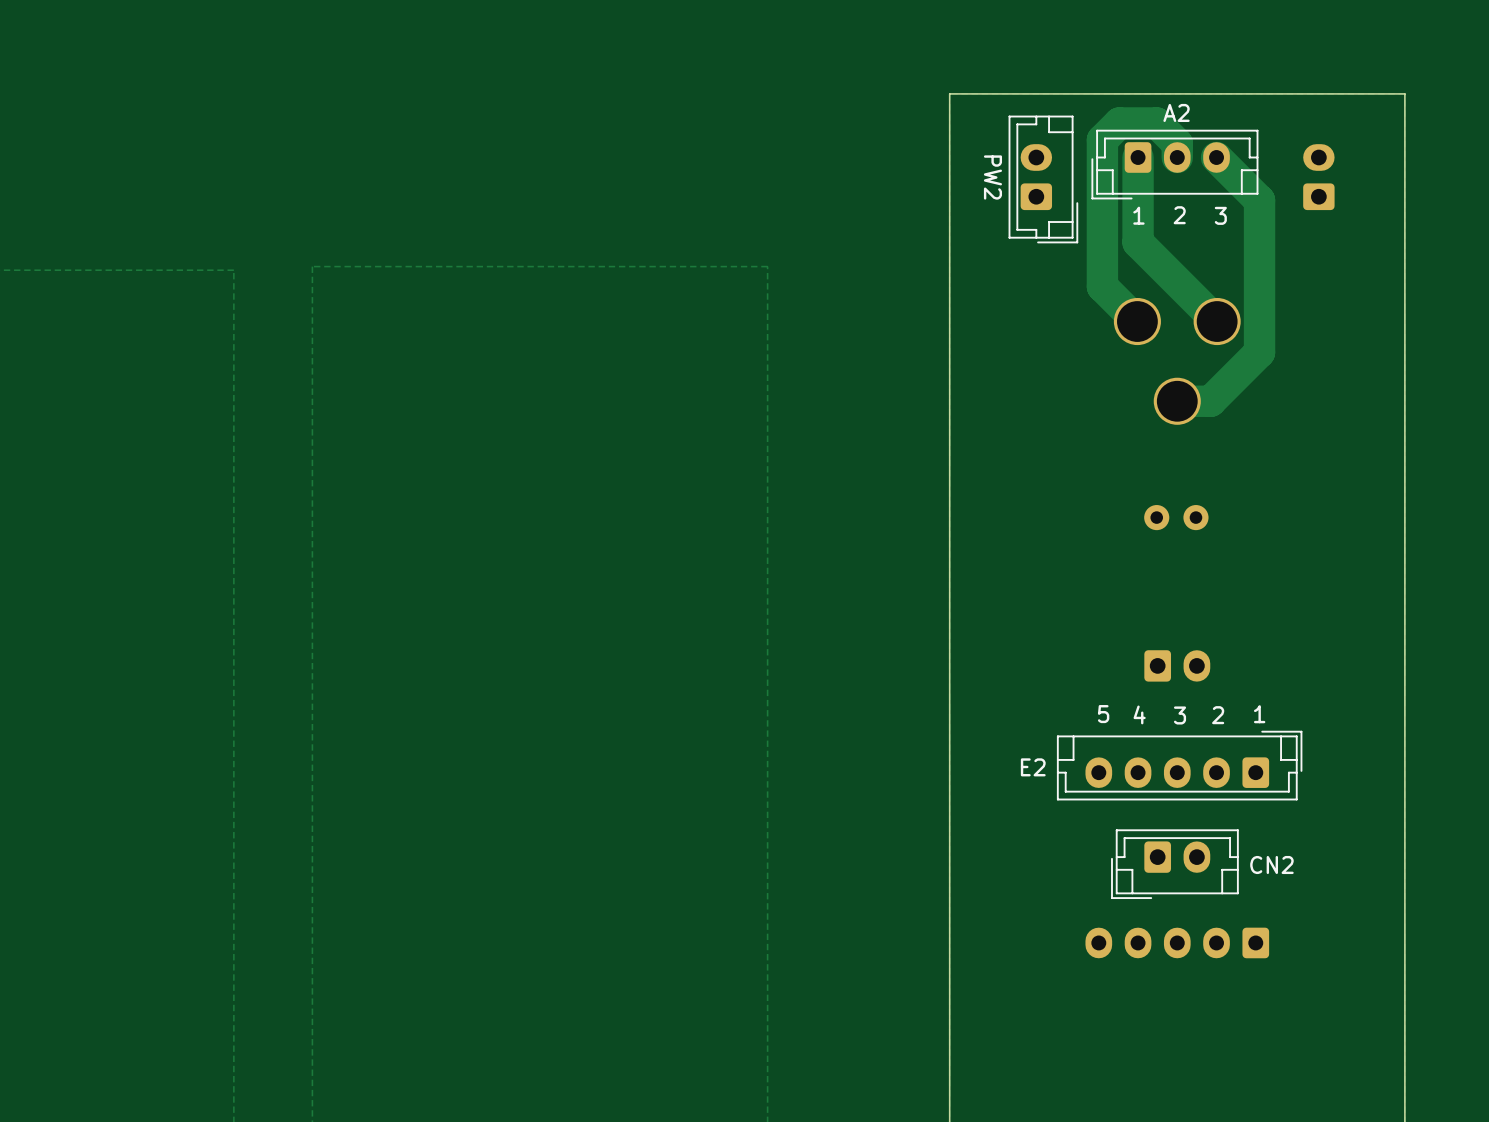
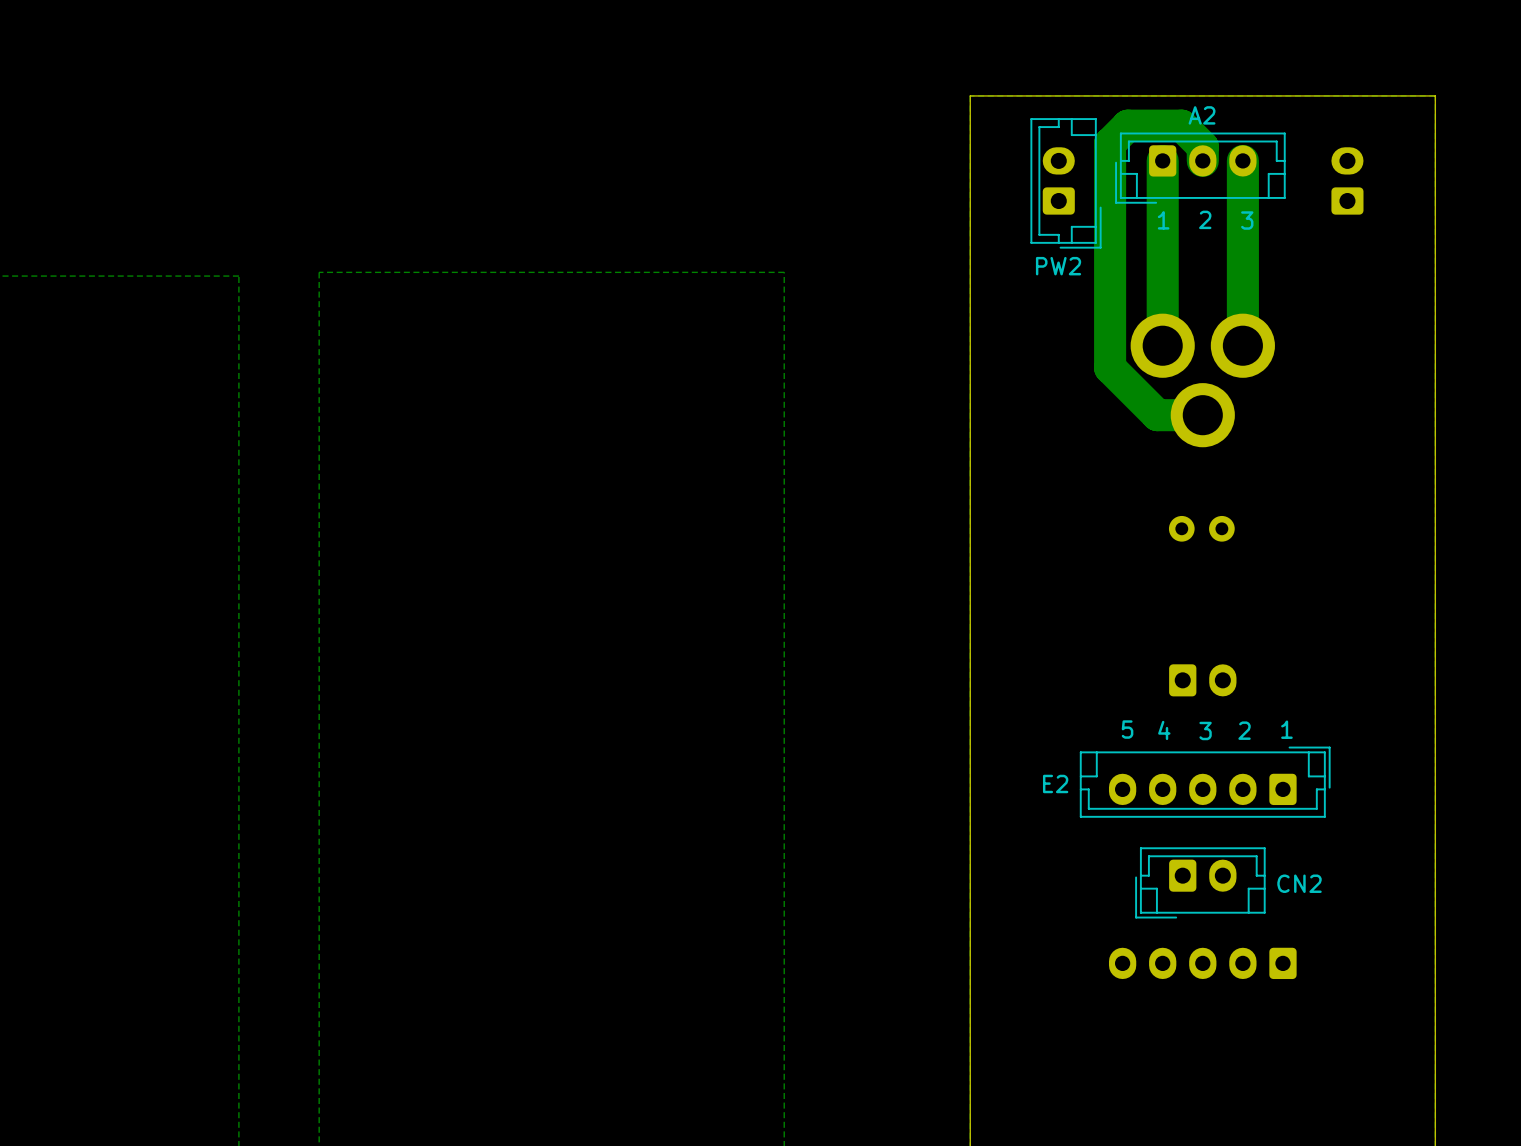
track: (1119, 122) (1102, 140) (1102, 286) (1137, 321) -> (1143, 125) (1127, 125) (1110, 143) (1110, 367) (1157, 415) (1202, 415)
track: (1216, 157) (1259, 200) (1259, 352) (1210, 401) (1177, 401) -> (1242, 160) (1242, 345)
PW2 name rotation: 0° (992, 177) -> 90° counterclockwise (1058, 266)
PW2 name position: PW2 (992, 177) -> PW2 (1058, 266)
track: (1138, 242) (1217, 321) -> (1162, 247) (1162, 345)
part footprint: [1113, 297, 1241, 425] -> [1130, 313, 1275, 448]

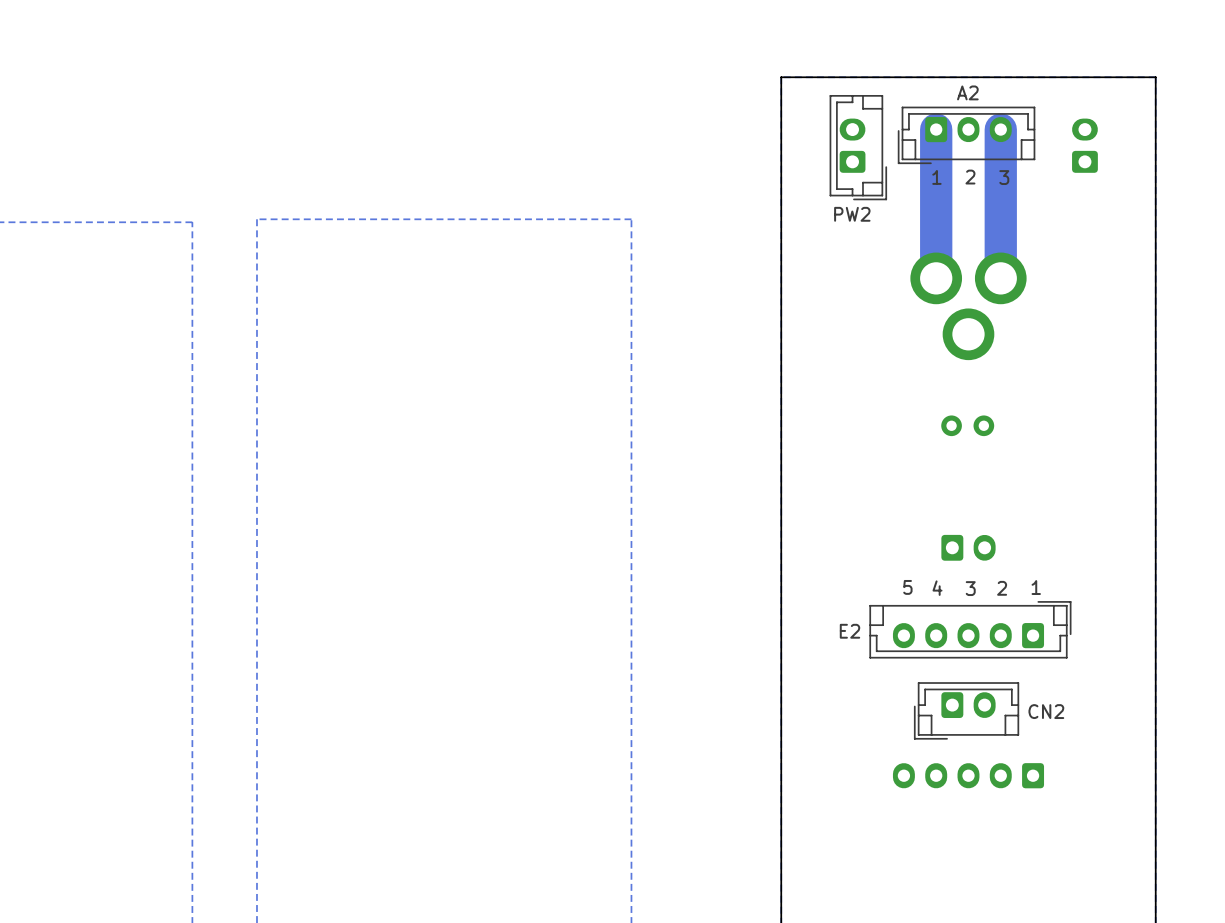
track width: thin (1162, 160) (1162, 345) -> thick (936, 129) (936, 278)
track: (1202, 160) (1202, 146) (1181, 125) (1127, 125) (1110, 143) (1110, 367) (1157, 415) (1202, 415) -> none
track width: thin (1242, 160) (1242, 345) -> thick (1000, 129) (1000, 278)

